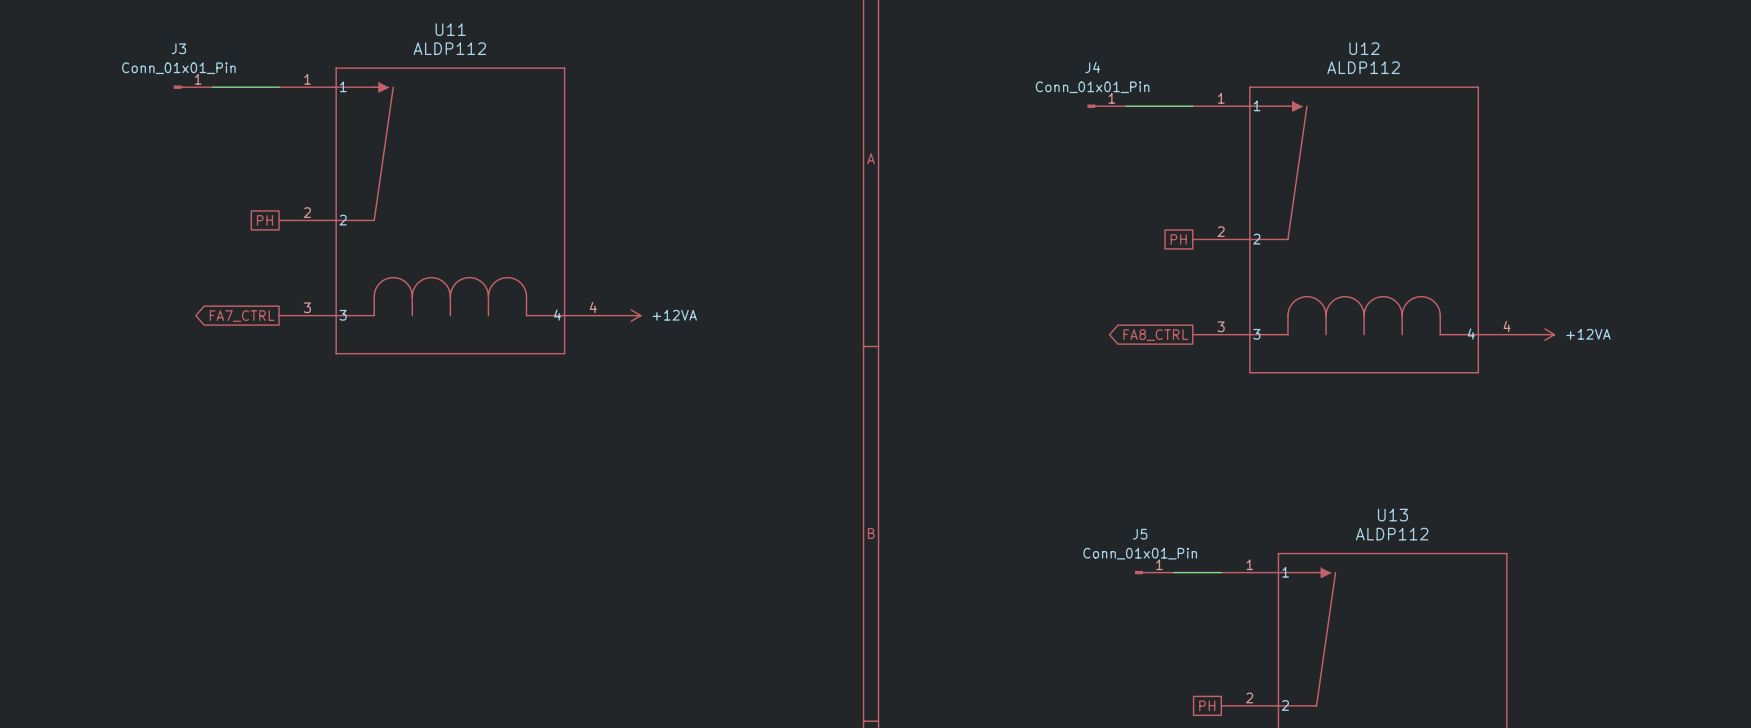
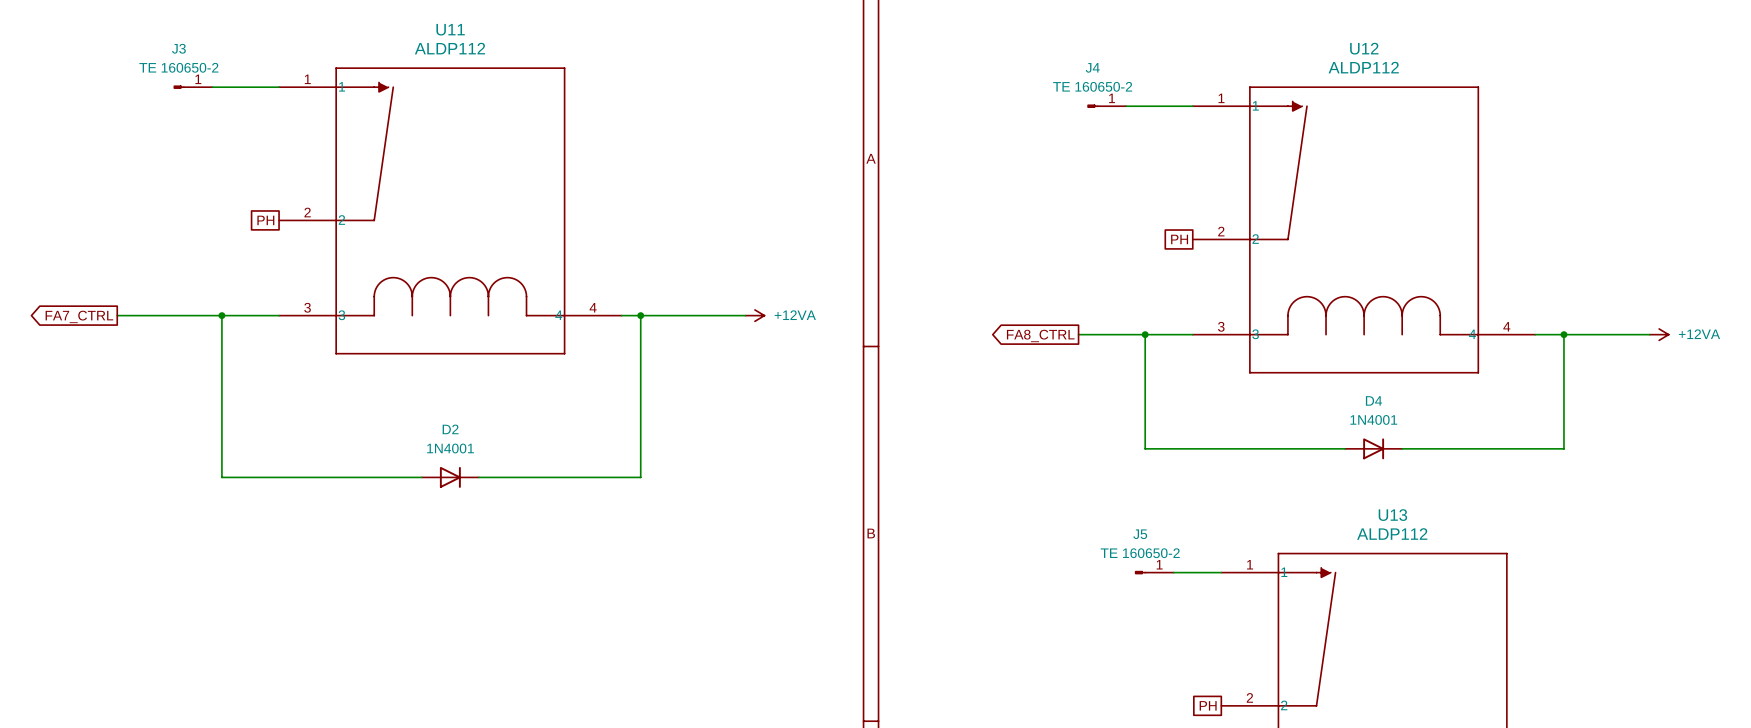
J3 value: Conn_01x01_Pin (178, 68) -> TE 160650-2 (178, 67)
J4 value: Conn_01x01_Pin (1092, 87) -> TE 160650-2 (1092, 86)
wire: none -> (117, 315) (279, 315)
wire: none -> (221, 315) (221, 477) (421, 477)
junction: none -> (221, 315)
wire: none -> (621, 315) (745, 315)
power symbol position: +12VA (631, 315) -> +12VA (754, 315)
wire: none -> (640, 315) (640, 477) (478, 477)
junction: none -> (640, 315)
global label position: FA7_CTRL (242, 316) -> FA7_CTRL (79, 316)
wire: none -> (1078, 334) (1192, 334)
wire: none -> (1145, 334) (1145, 448) (1345, 448)
junction: none -> (1145, 334)
wire: none -> (1535, 334) (1649, 334)
power symbol position: +12VA (1544, 334) -> +12VA (1659, 334)
wire: none -> (1563, 334) (1563, 448) (1402, 448)
junction: none -> (1563, 334)
global label position: FA8_CTRL (1155, 335) -> FA8_CTRL (1040, 335)
D4: none -> 1N4001 (1373, 448)
D2: none -> 1N4001 (450, 477)
J5 value: Conn_01x01_Pin (1140, 553) -> TE 160650-2 (1140, 553)

